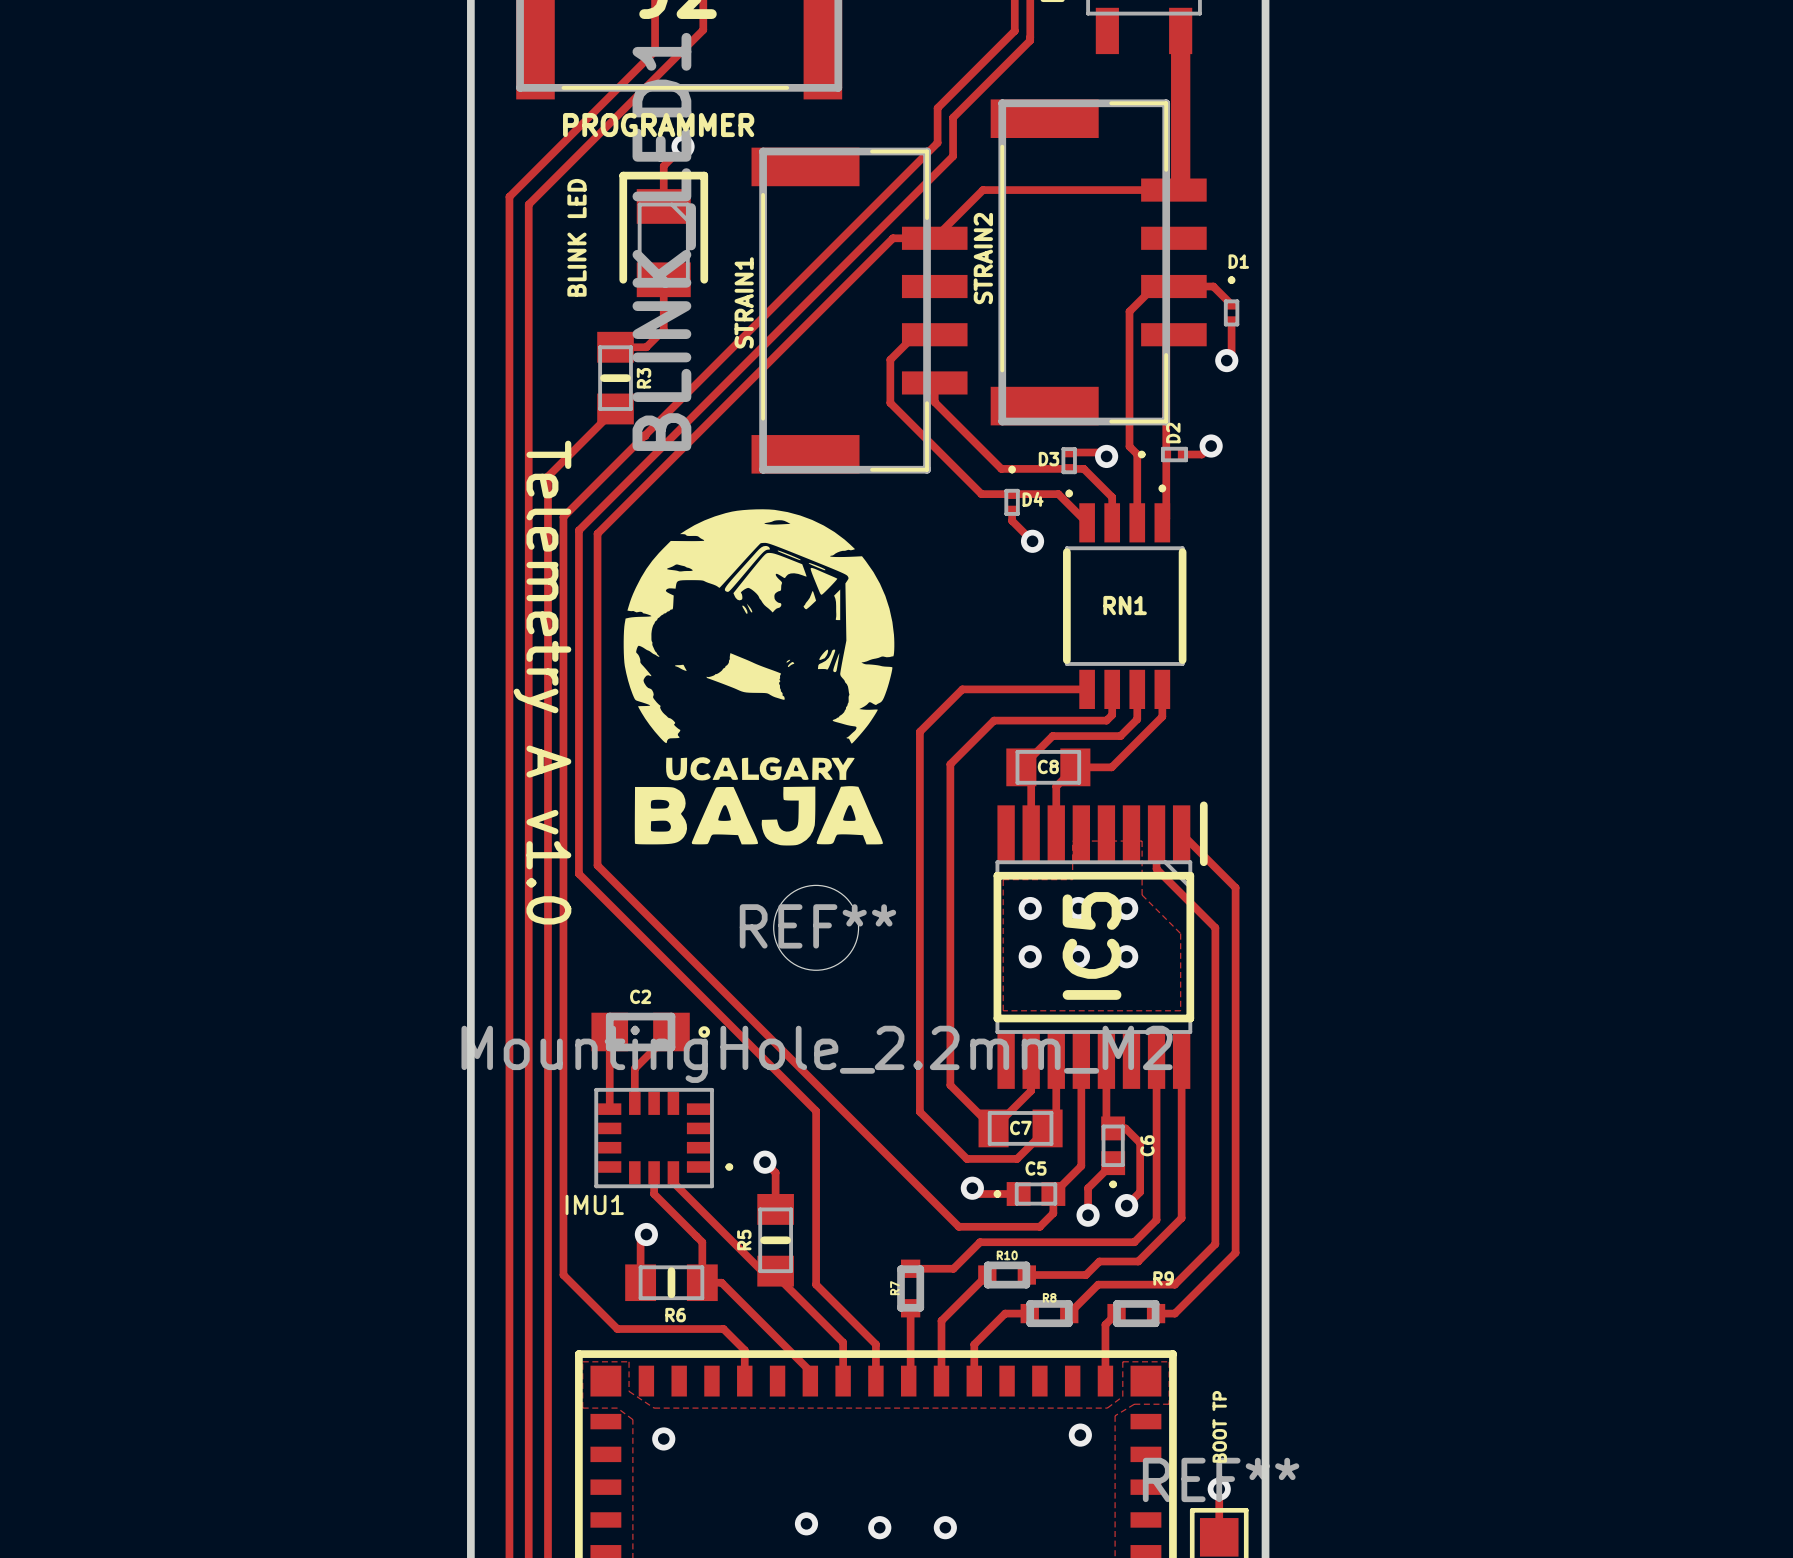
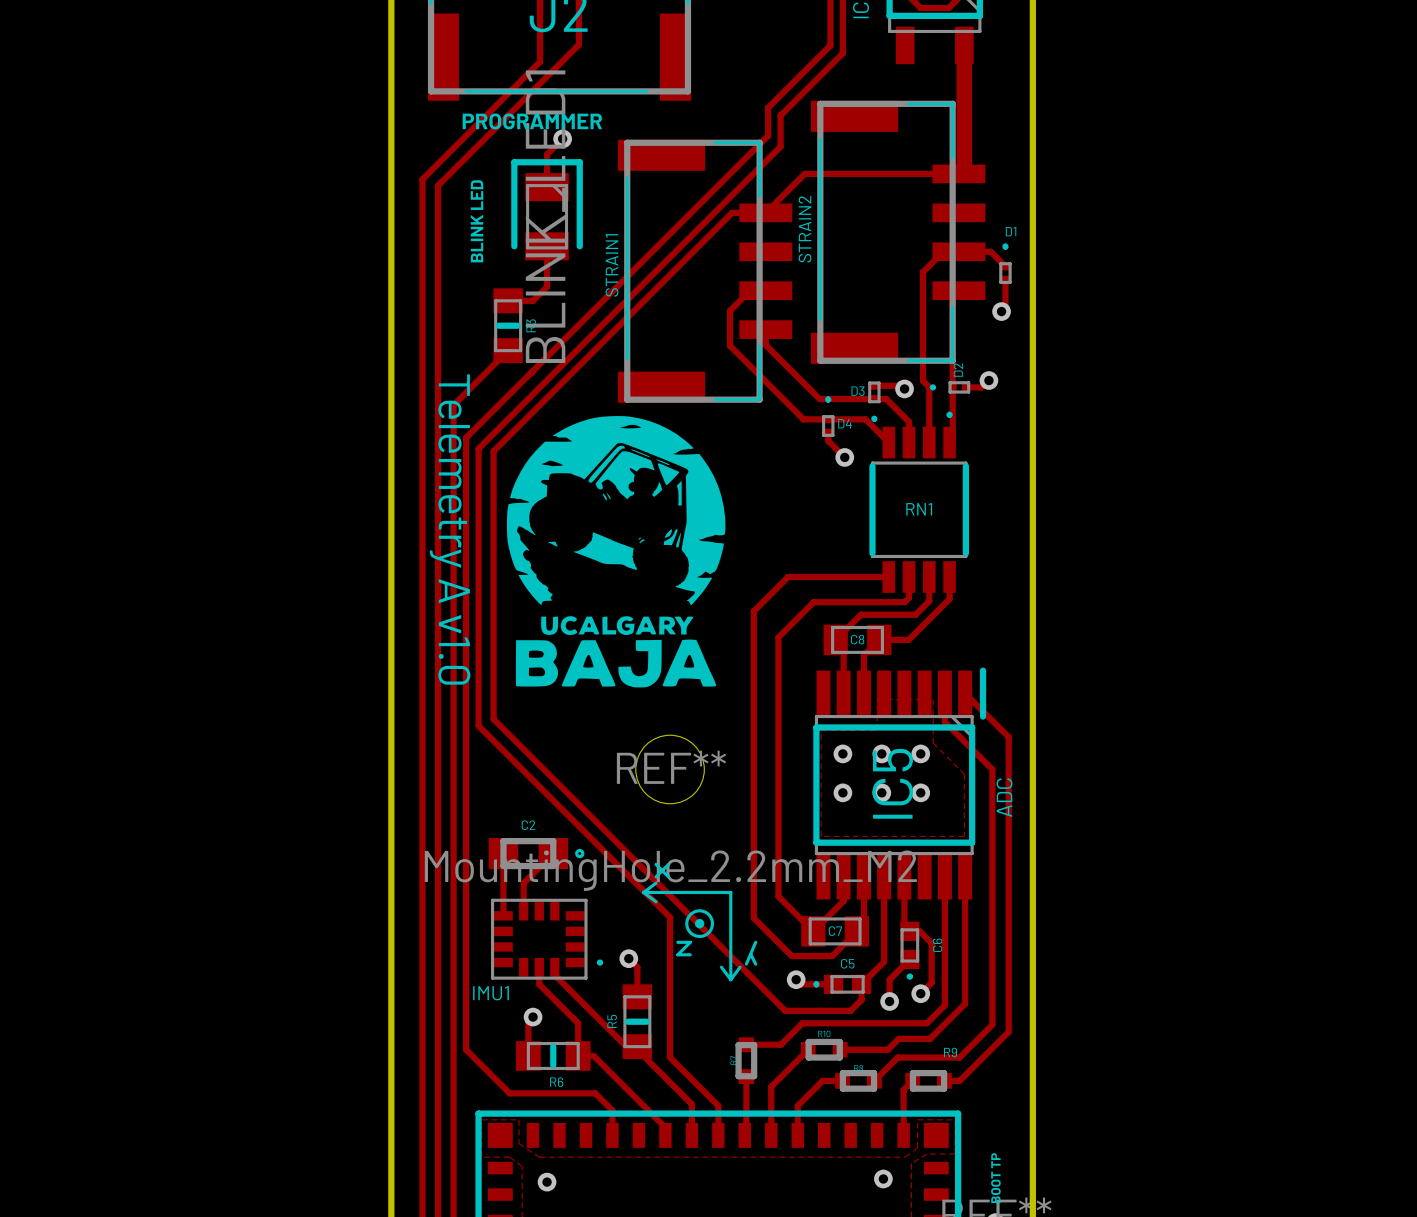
drawing position: (759, 677) -> (616, 551)
text: none -> ADC (1004, 797)
drawing: none -> [642, 862, 758, 982]

